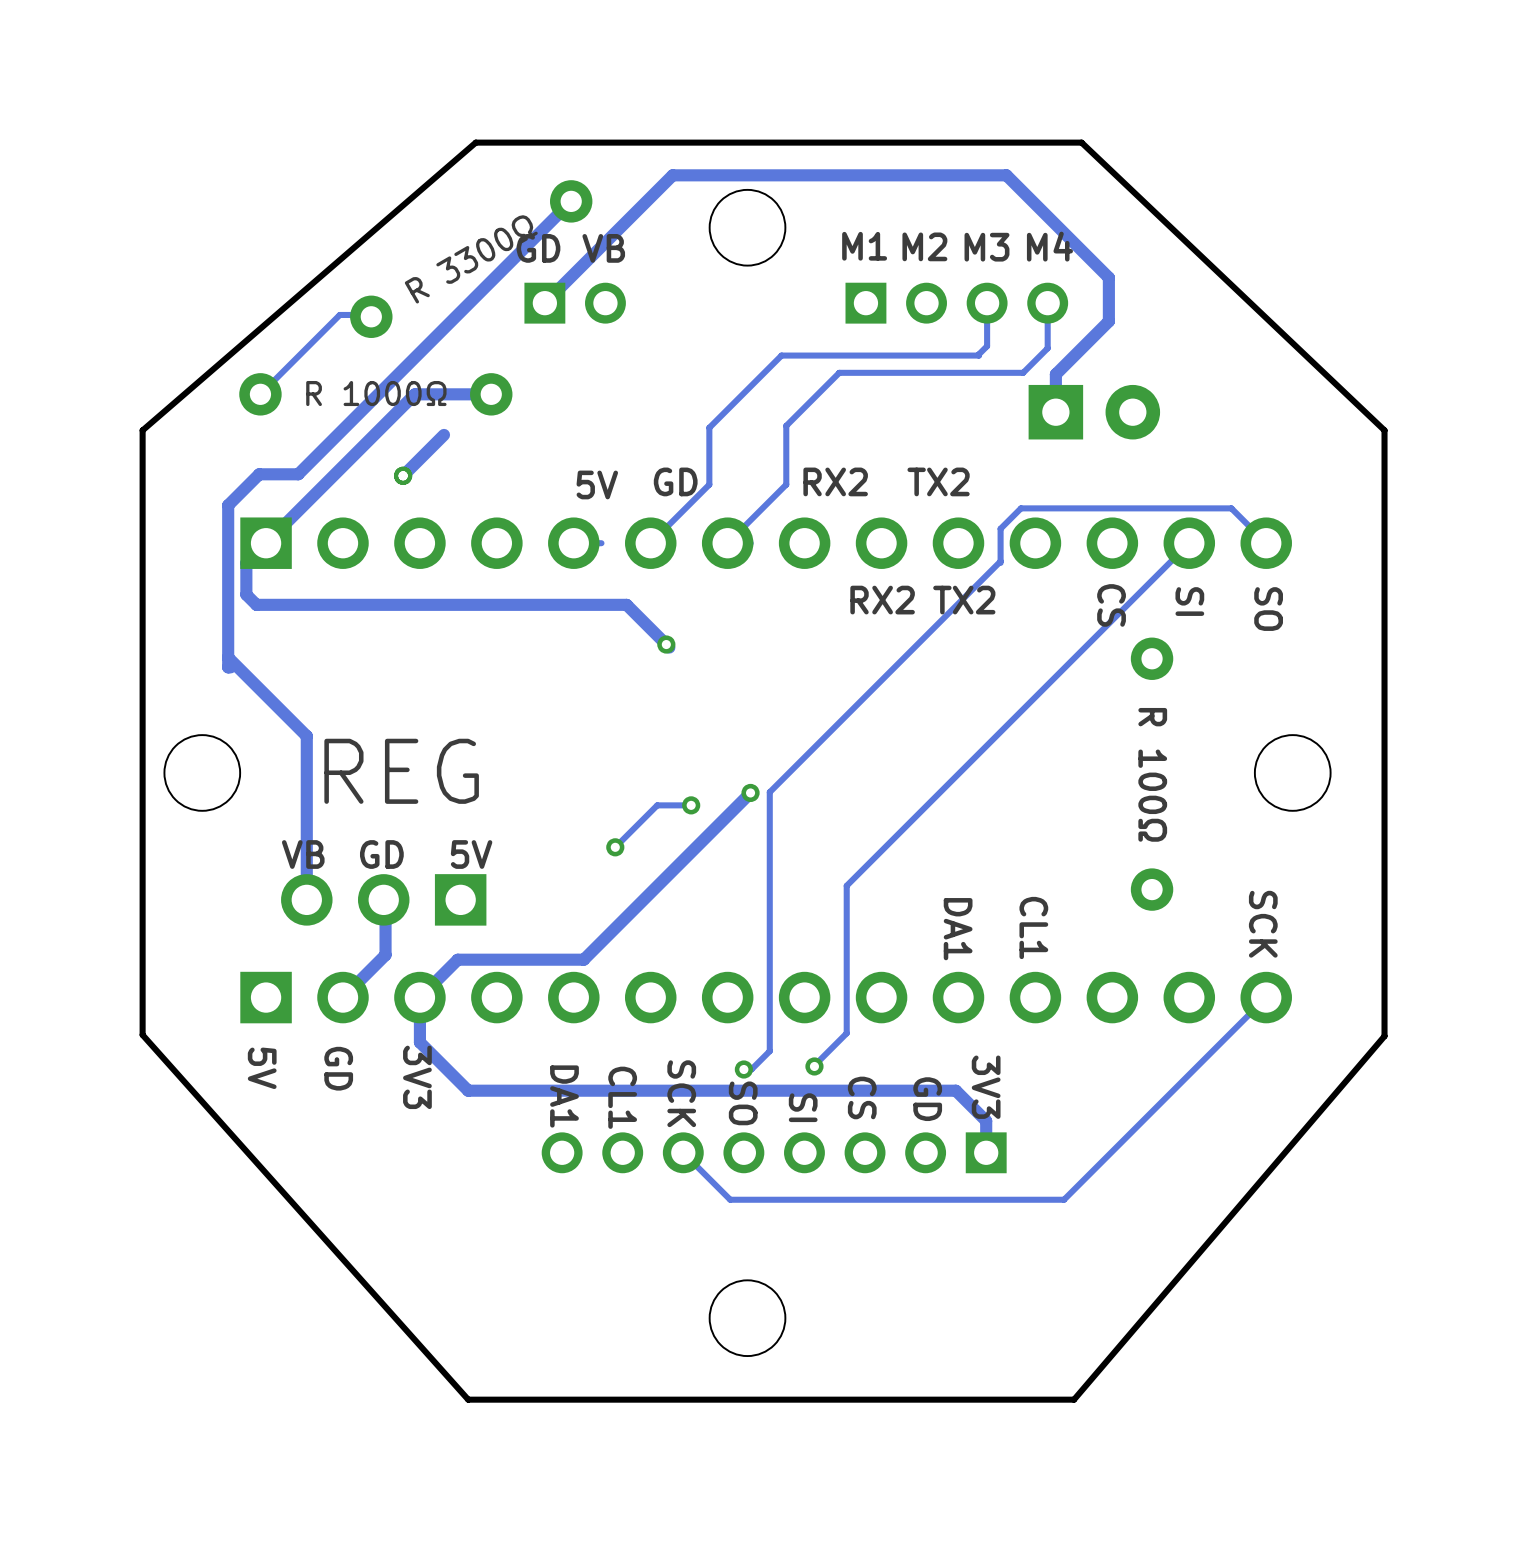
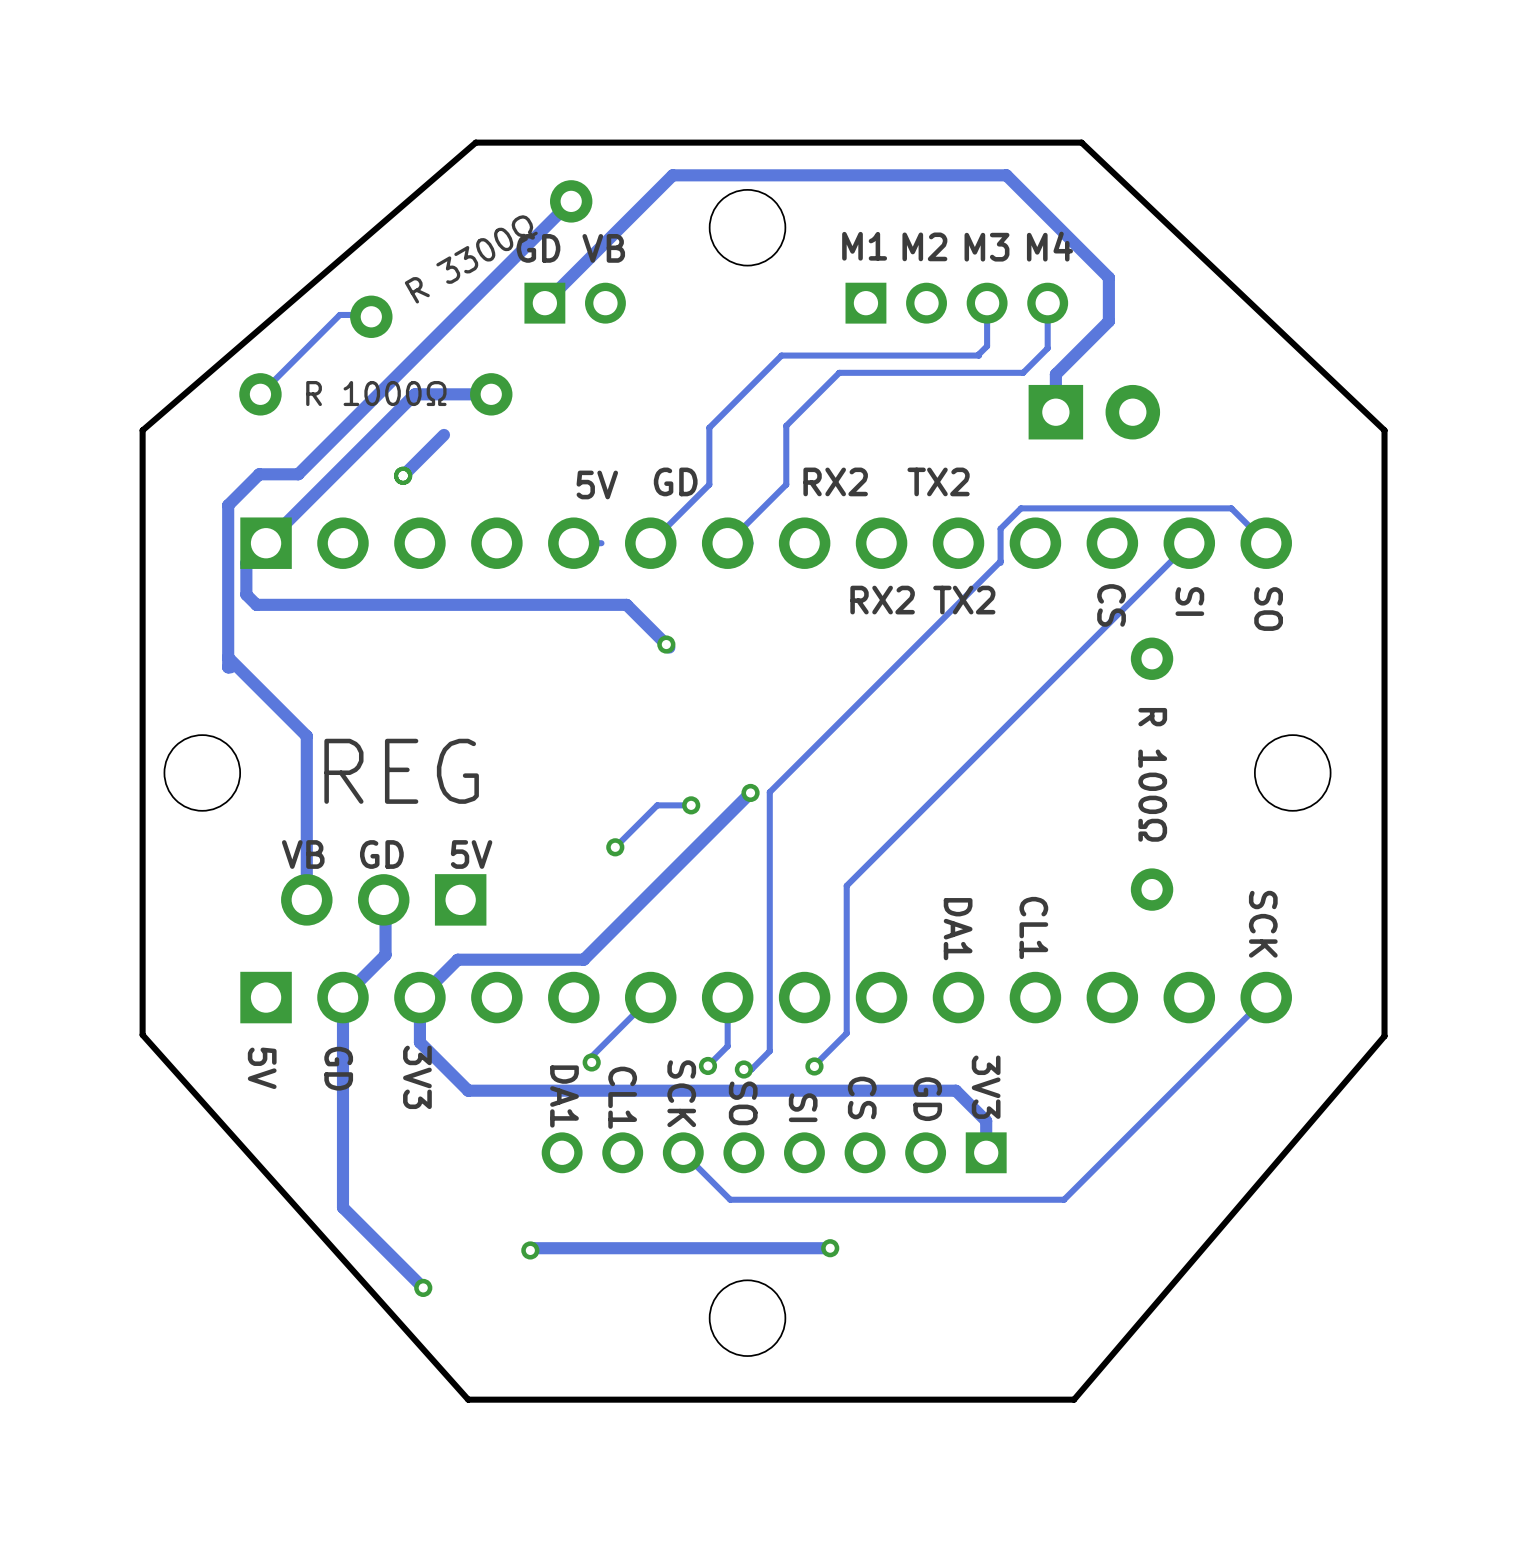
track: none -> (342, 997) (342, 1207) (423, 1287)
track: none -> (650, 997) (591, 1056) (591, 1062)
track: none -> (727, 997) (727, 1046) (707, 1065)
via: none -> (591, 1062)
via: none -> (707, 1065)
track: none -> (830, 1248) (532, 1248) (530, 1250)
via: none -> (830, 1248)
via: none -> (530, 1250)
via: none -> (423, 1287)

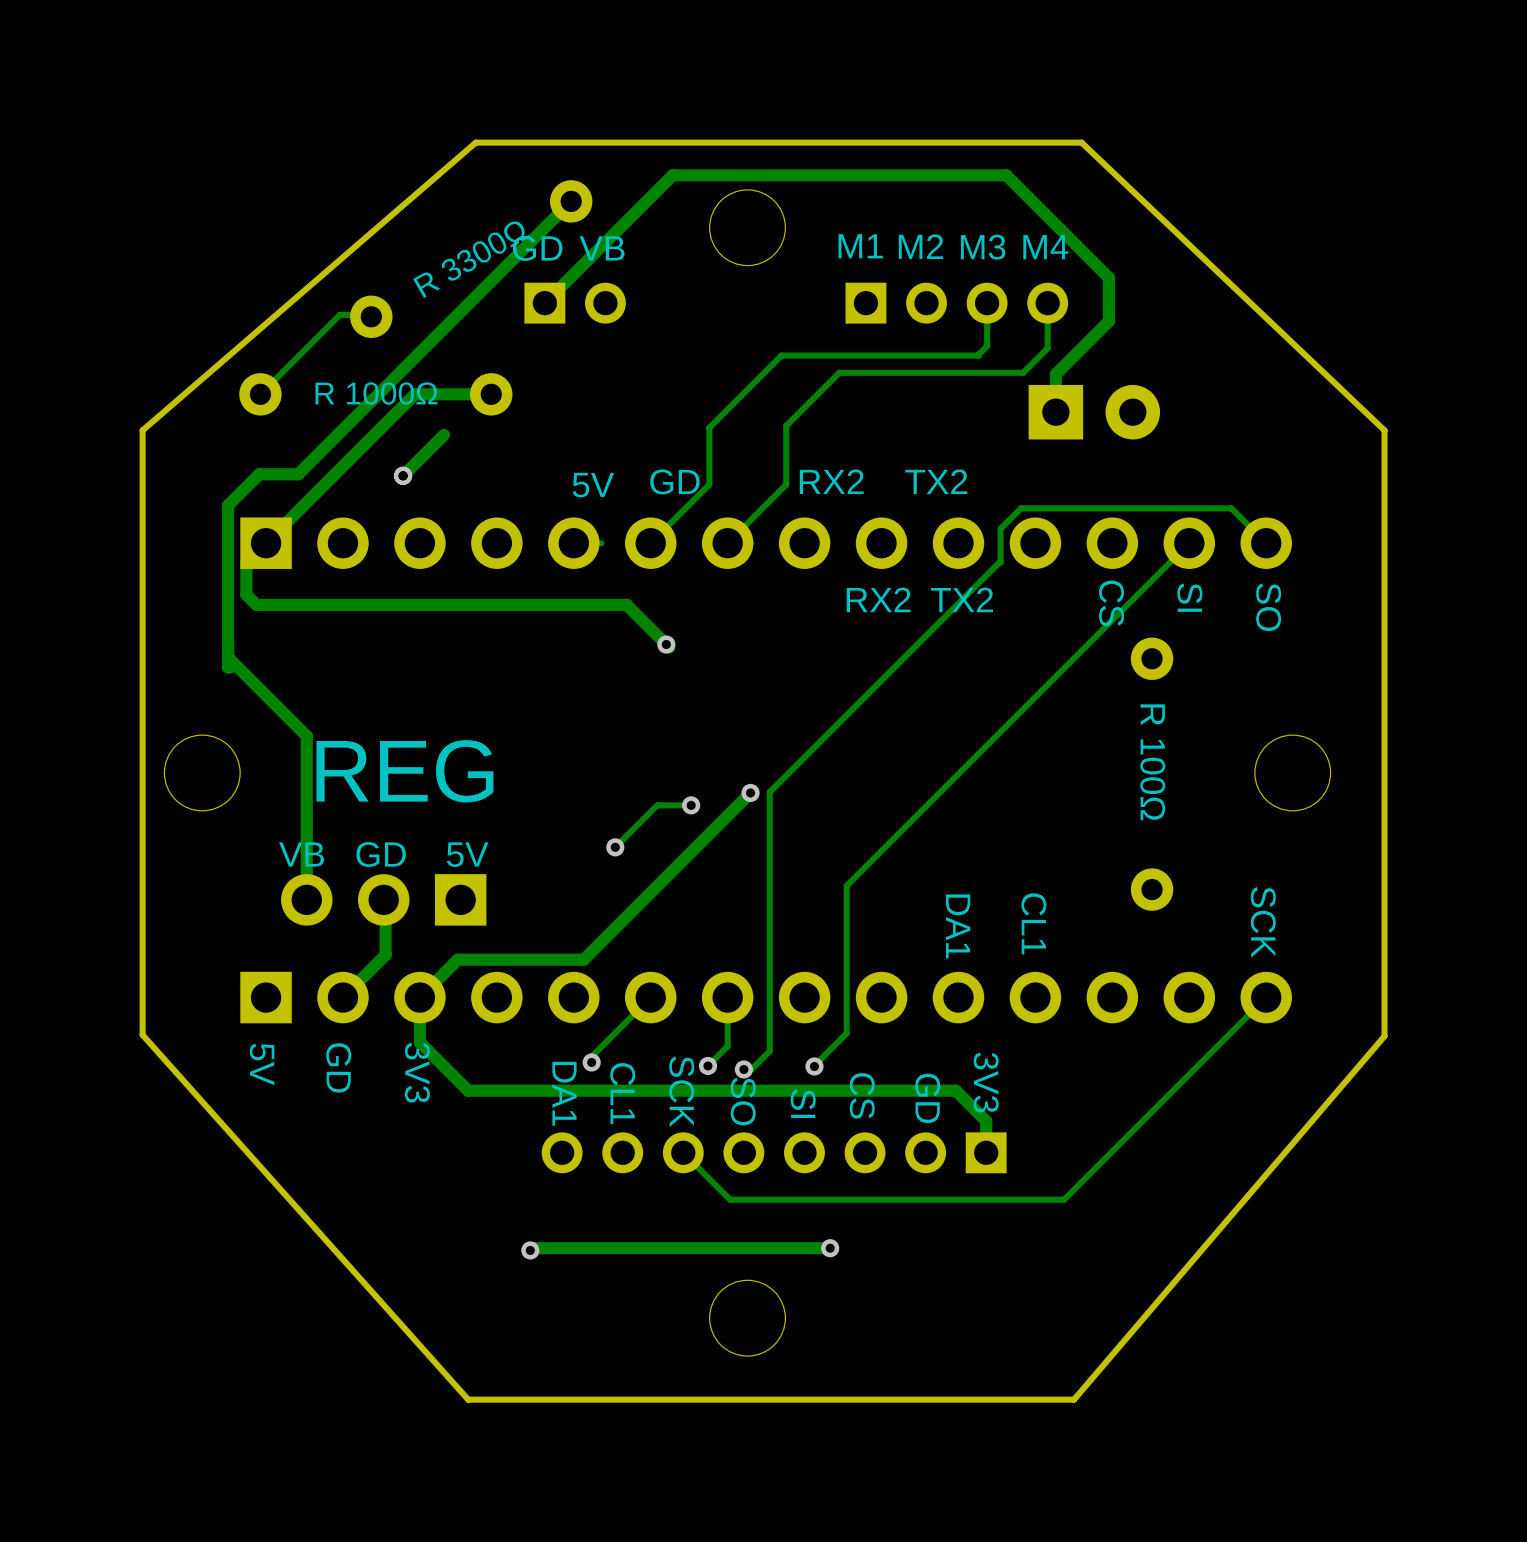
track: (342, 997) (342, 1207) (423, 1287) -> none
via: (423, 1287) -> none

